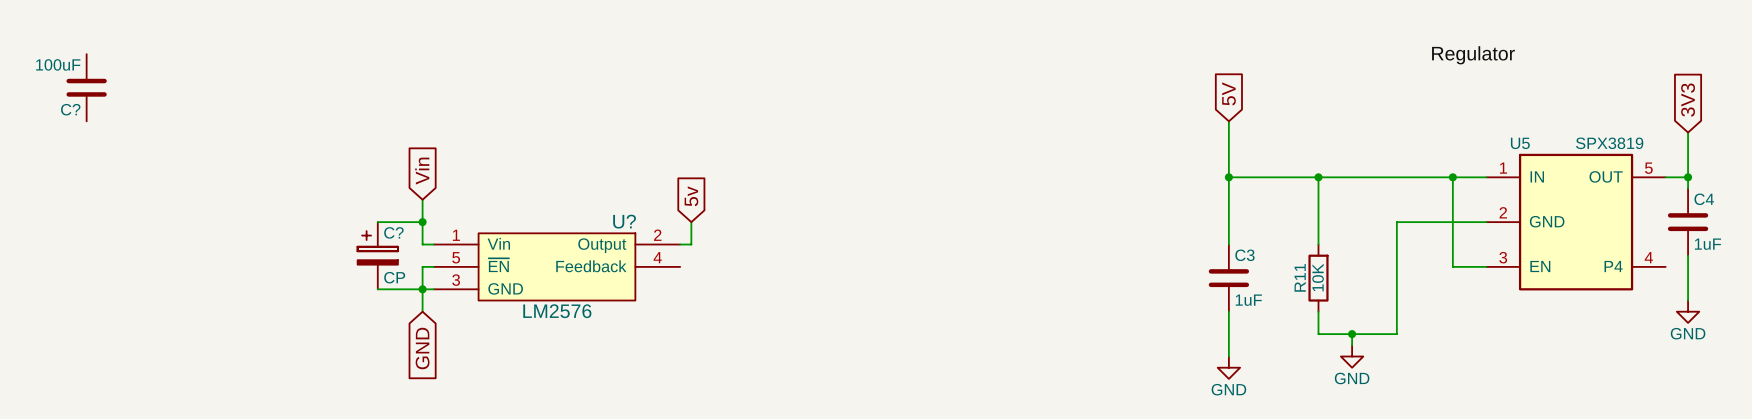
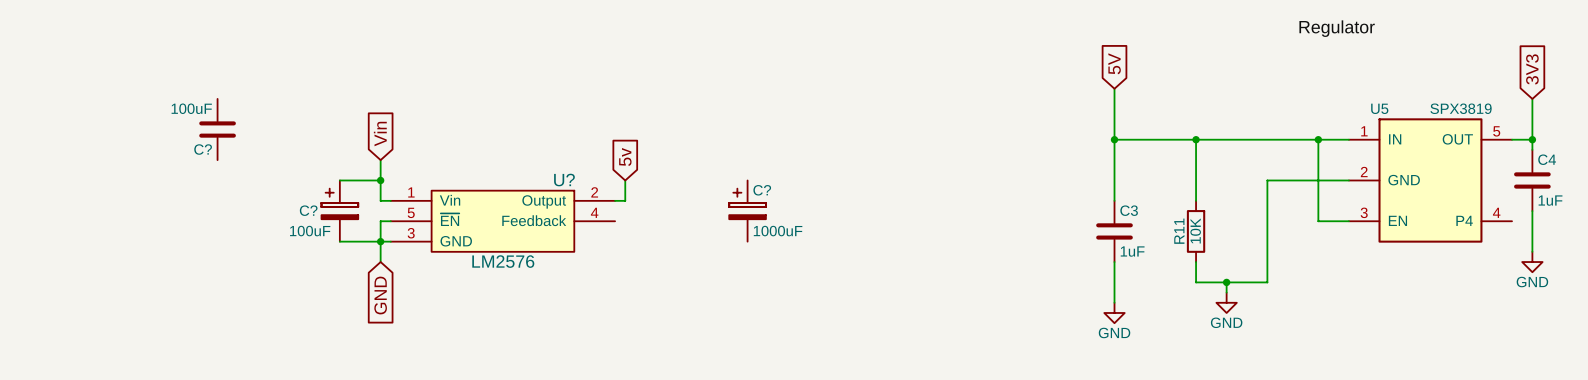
C? position: (86, 87) -> (217, 129)
C? name position: C? (393, 232) -> C? (308, 210)
C?: none -> 1000uF (747, 211)
C? value: CP (394, 277) -> 100uF (310, 231)

